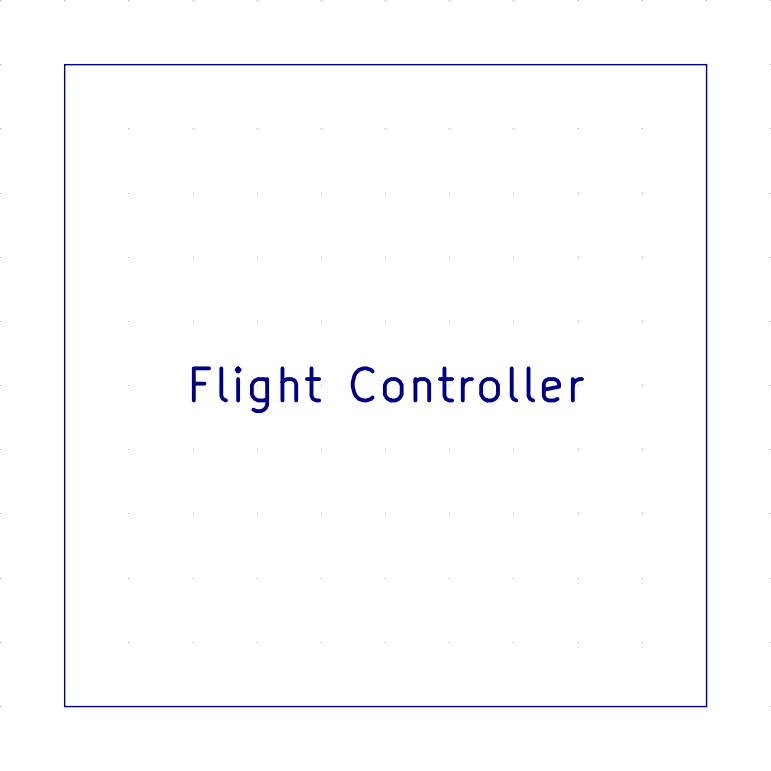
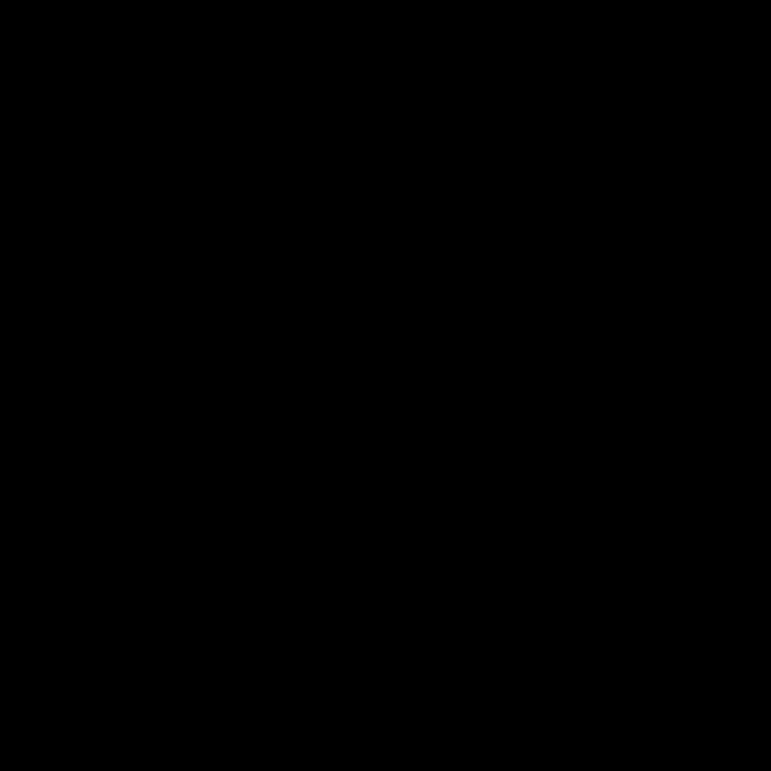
line: (64, 64) (706, 64) (706, 706) (64, 706) (64, 64) -> none
text: Flight Controller (387, 389) -> none

